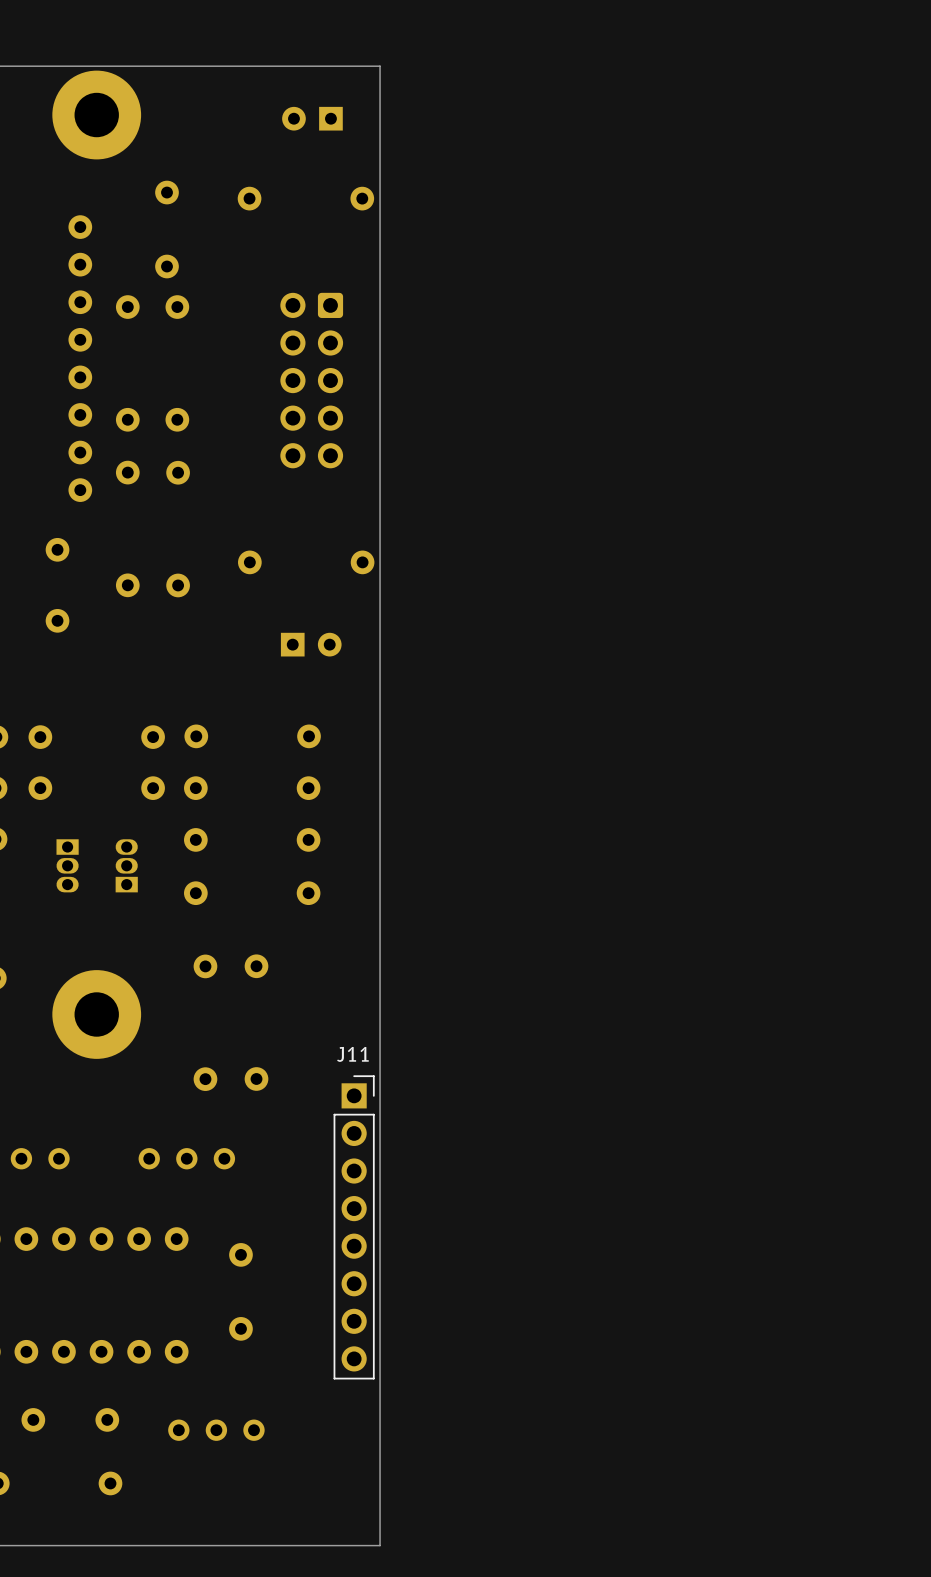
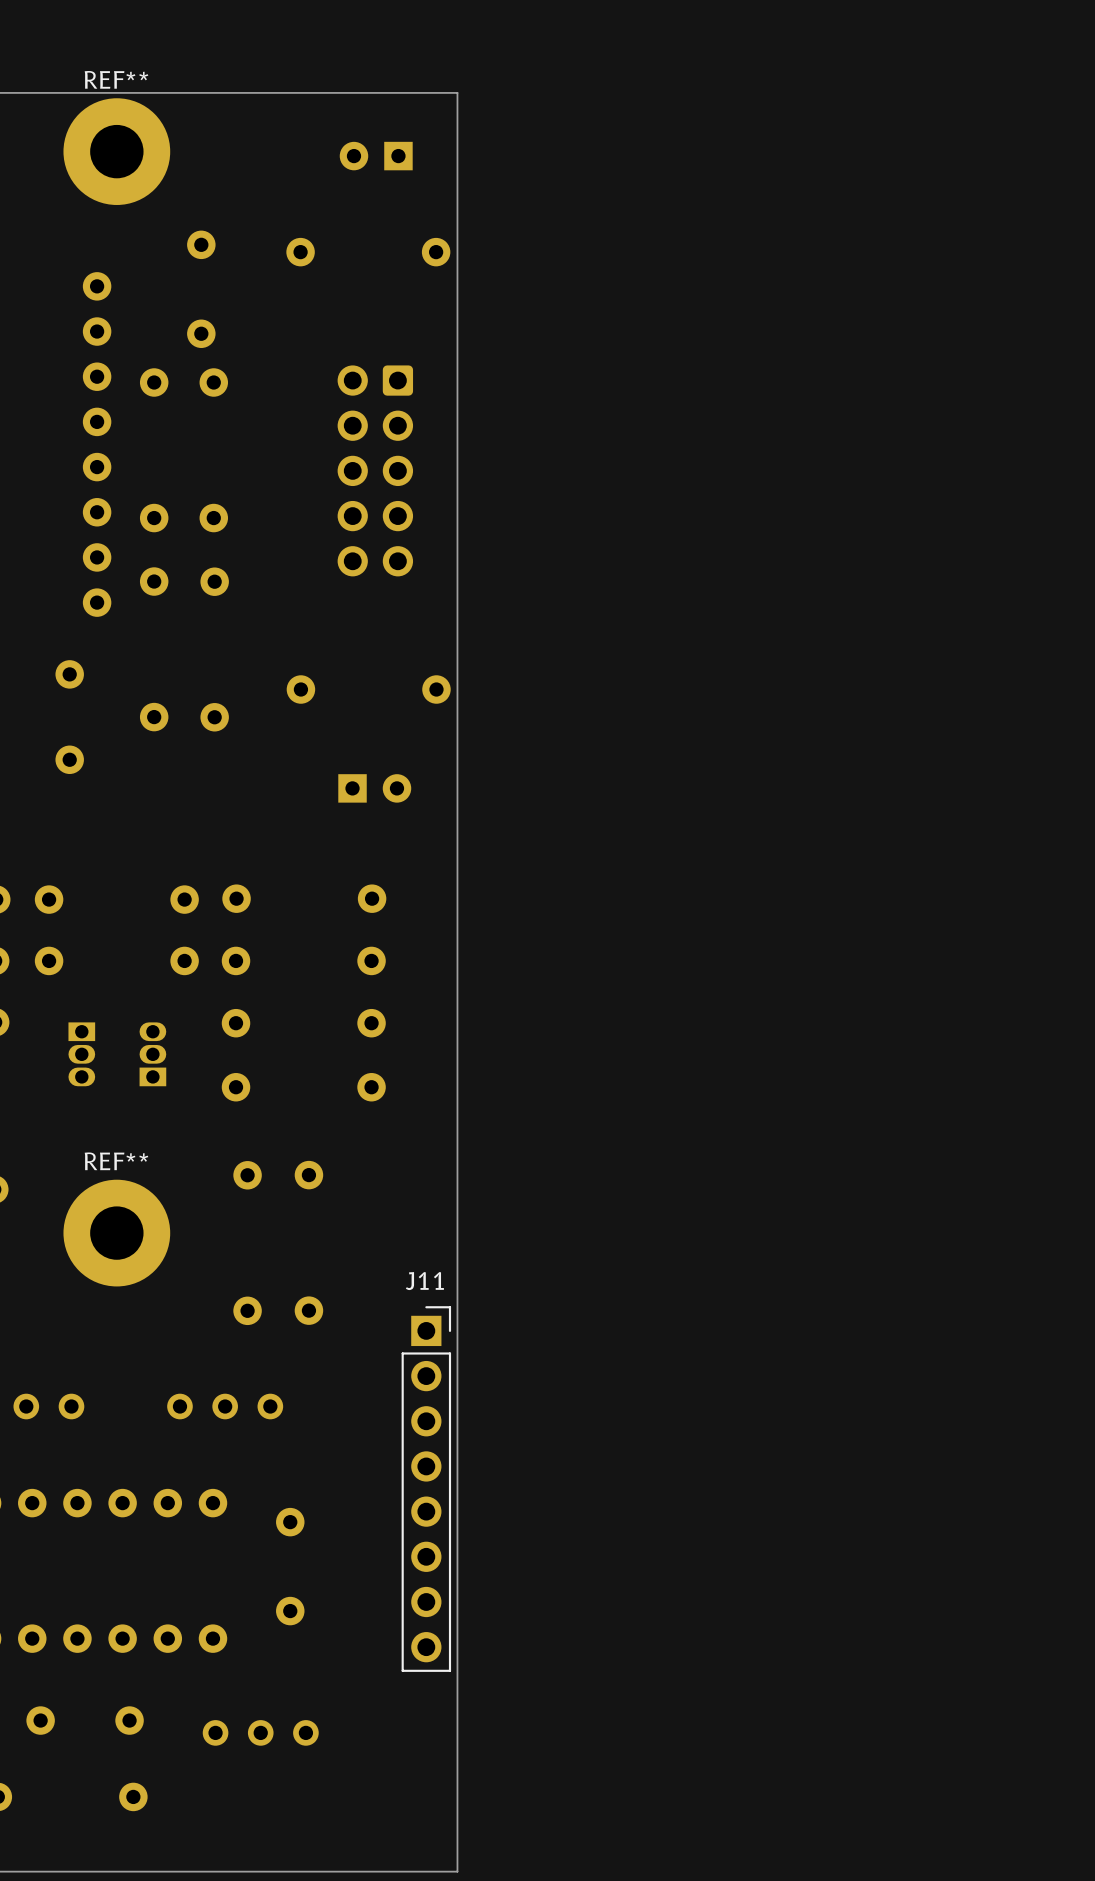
REF** name: none -> REF** (116, 79)
REF** name: none -> REF** (116, 1161)

